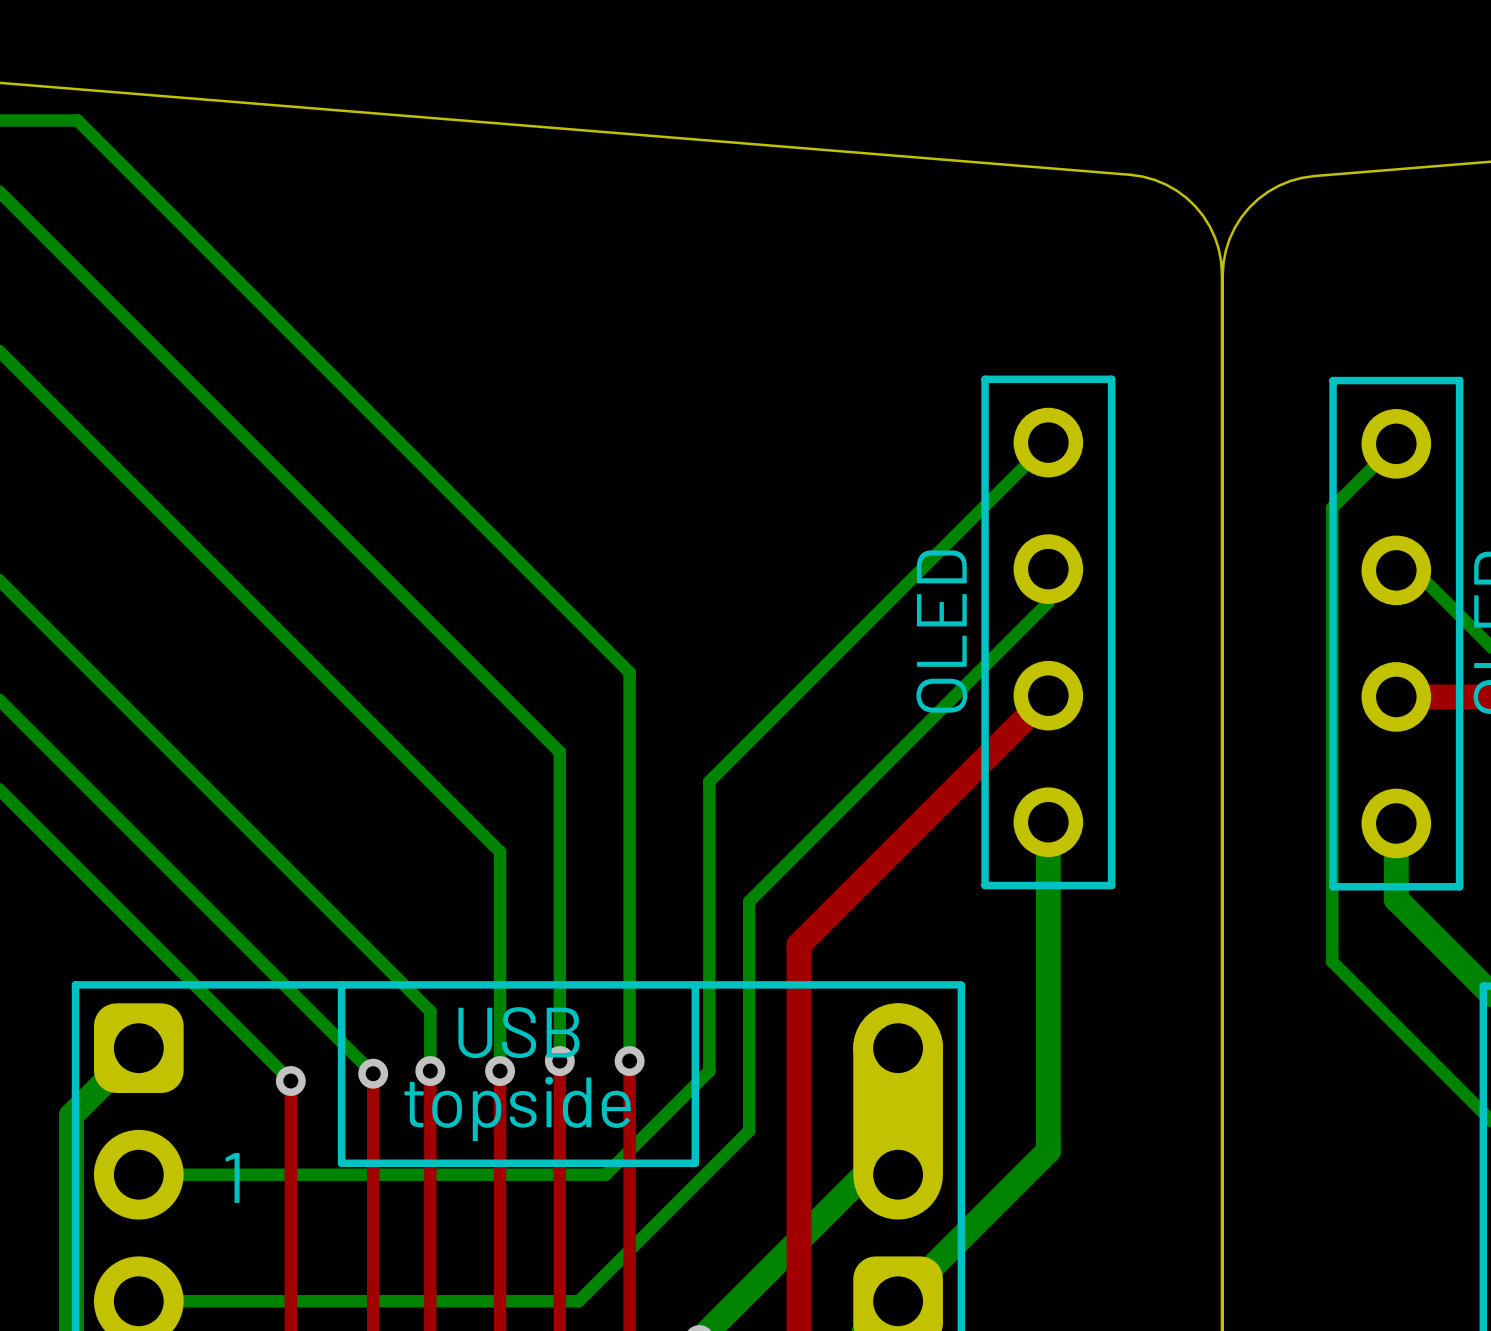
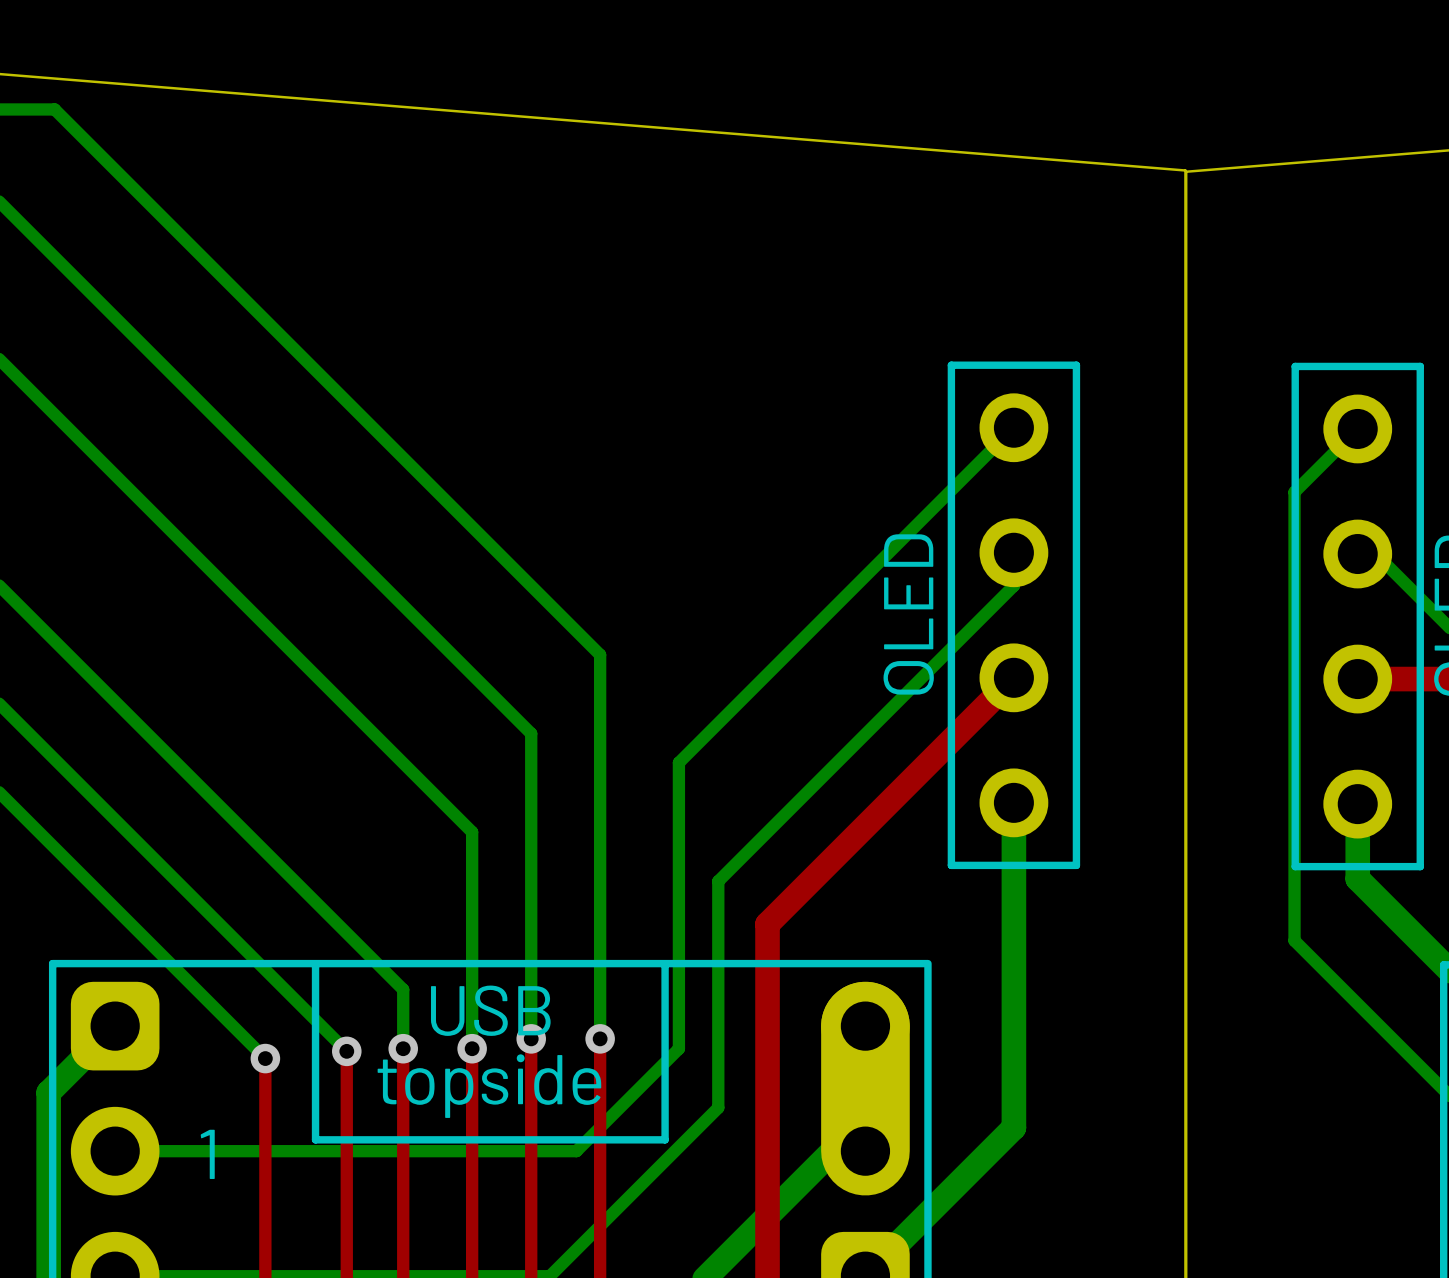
board edge: (1130, 174) (1154, 179) (1165, 184) (1186, 198) (1195, 206) (1209, 226) (1215, 237) (1221, 261) (1221, 274) -> (1094, 163) (1185, 170) (1185, 261)
board edge: (1314, 176) (1302, 177) (1278, 185) (1258, 199) (1249, 207) (1234, 227) (1229, 239) (1225, 250) (1222, 275) -> (1276, 164) (1186, 171) (1186, 262)

